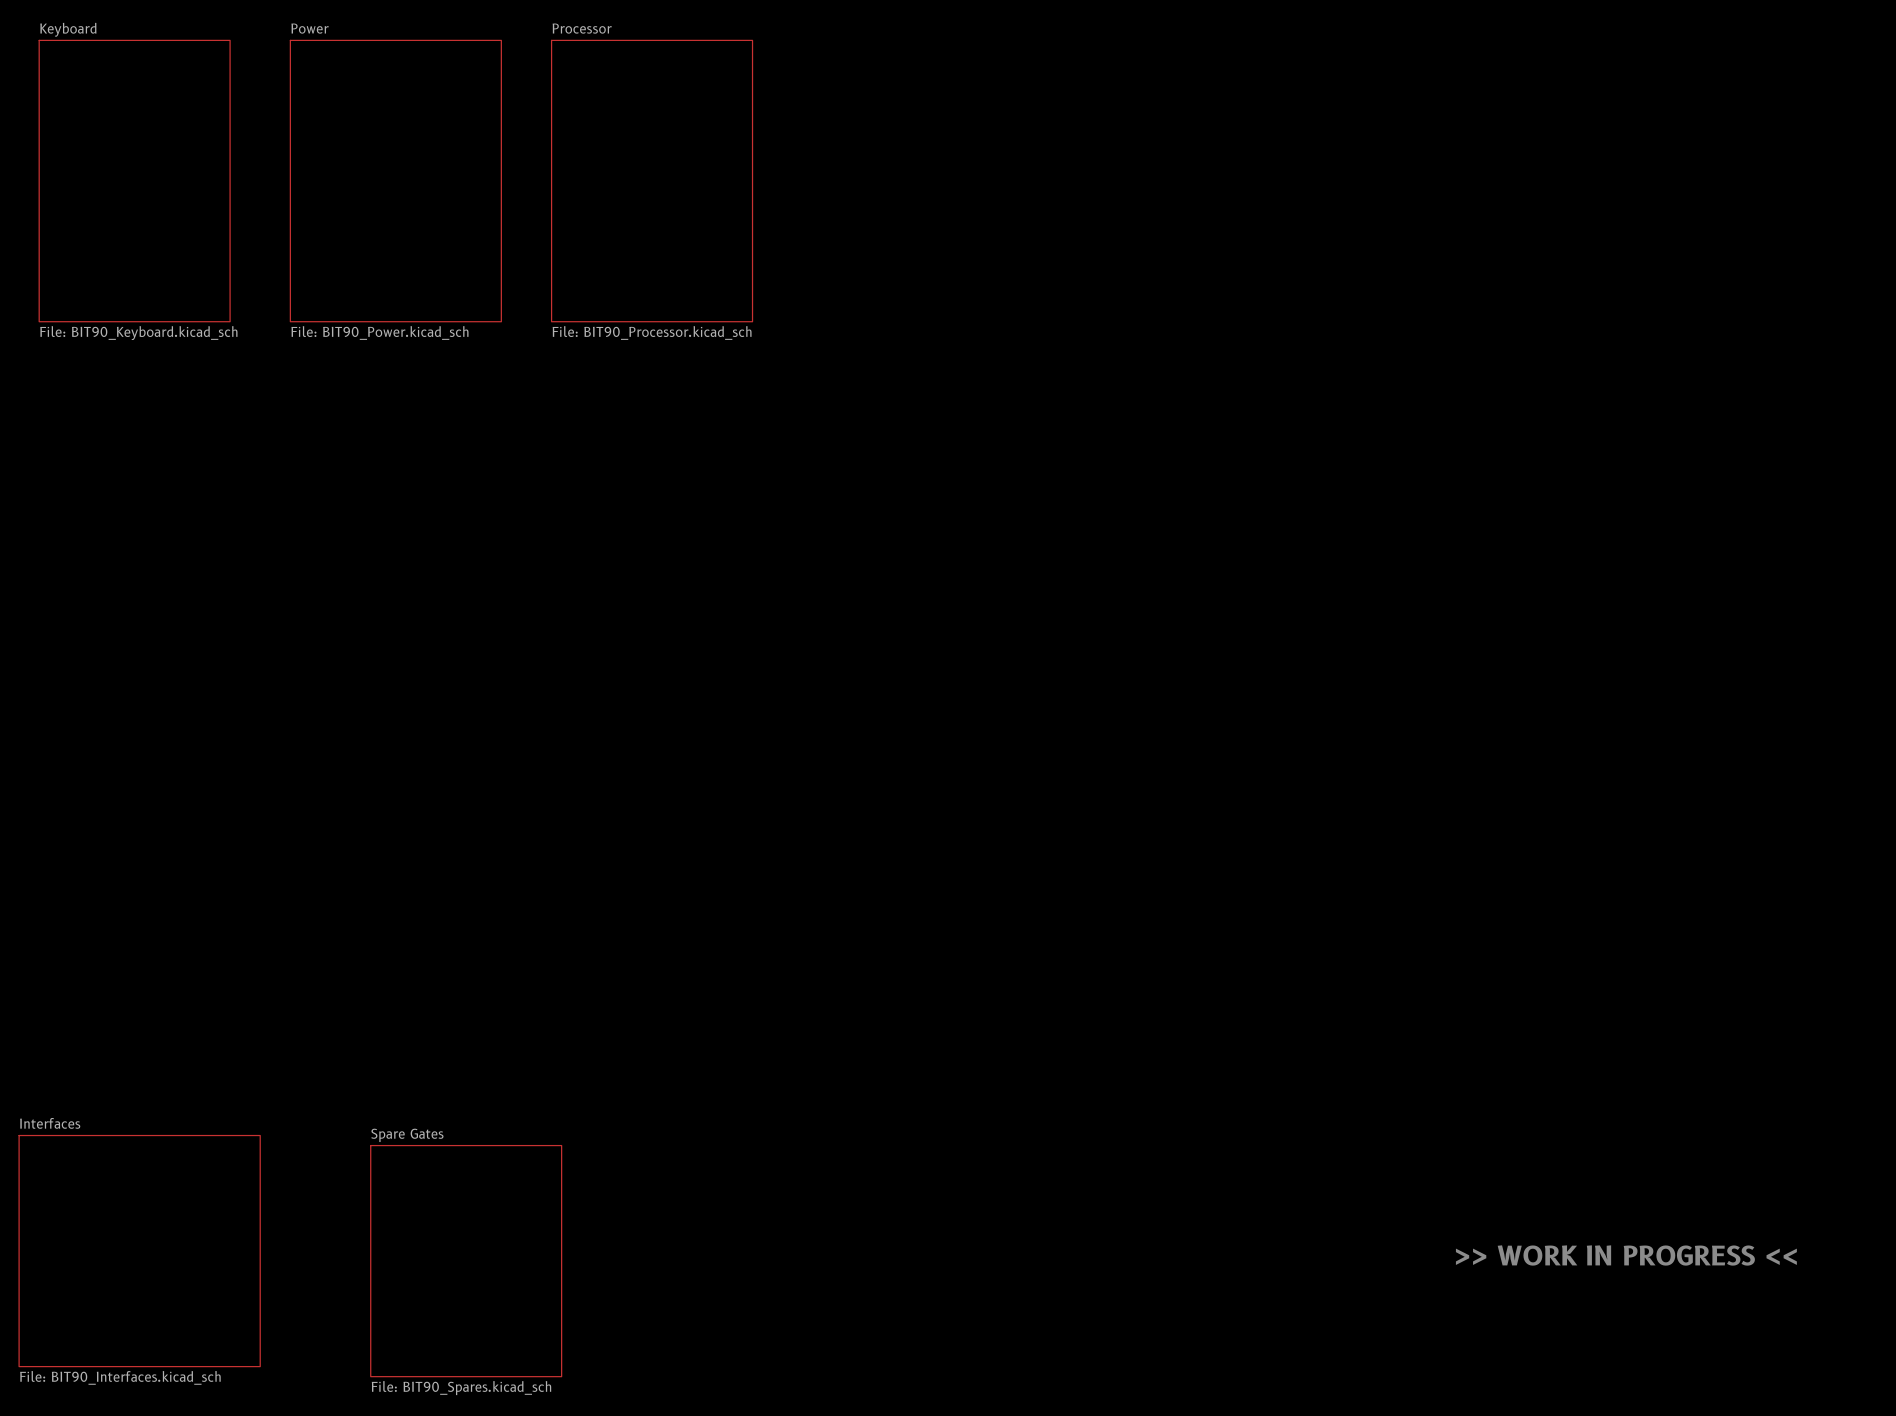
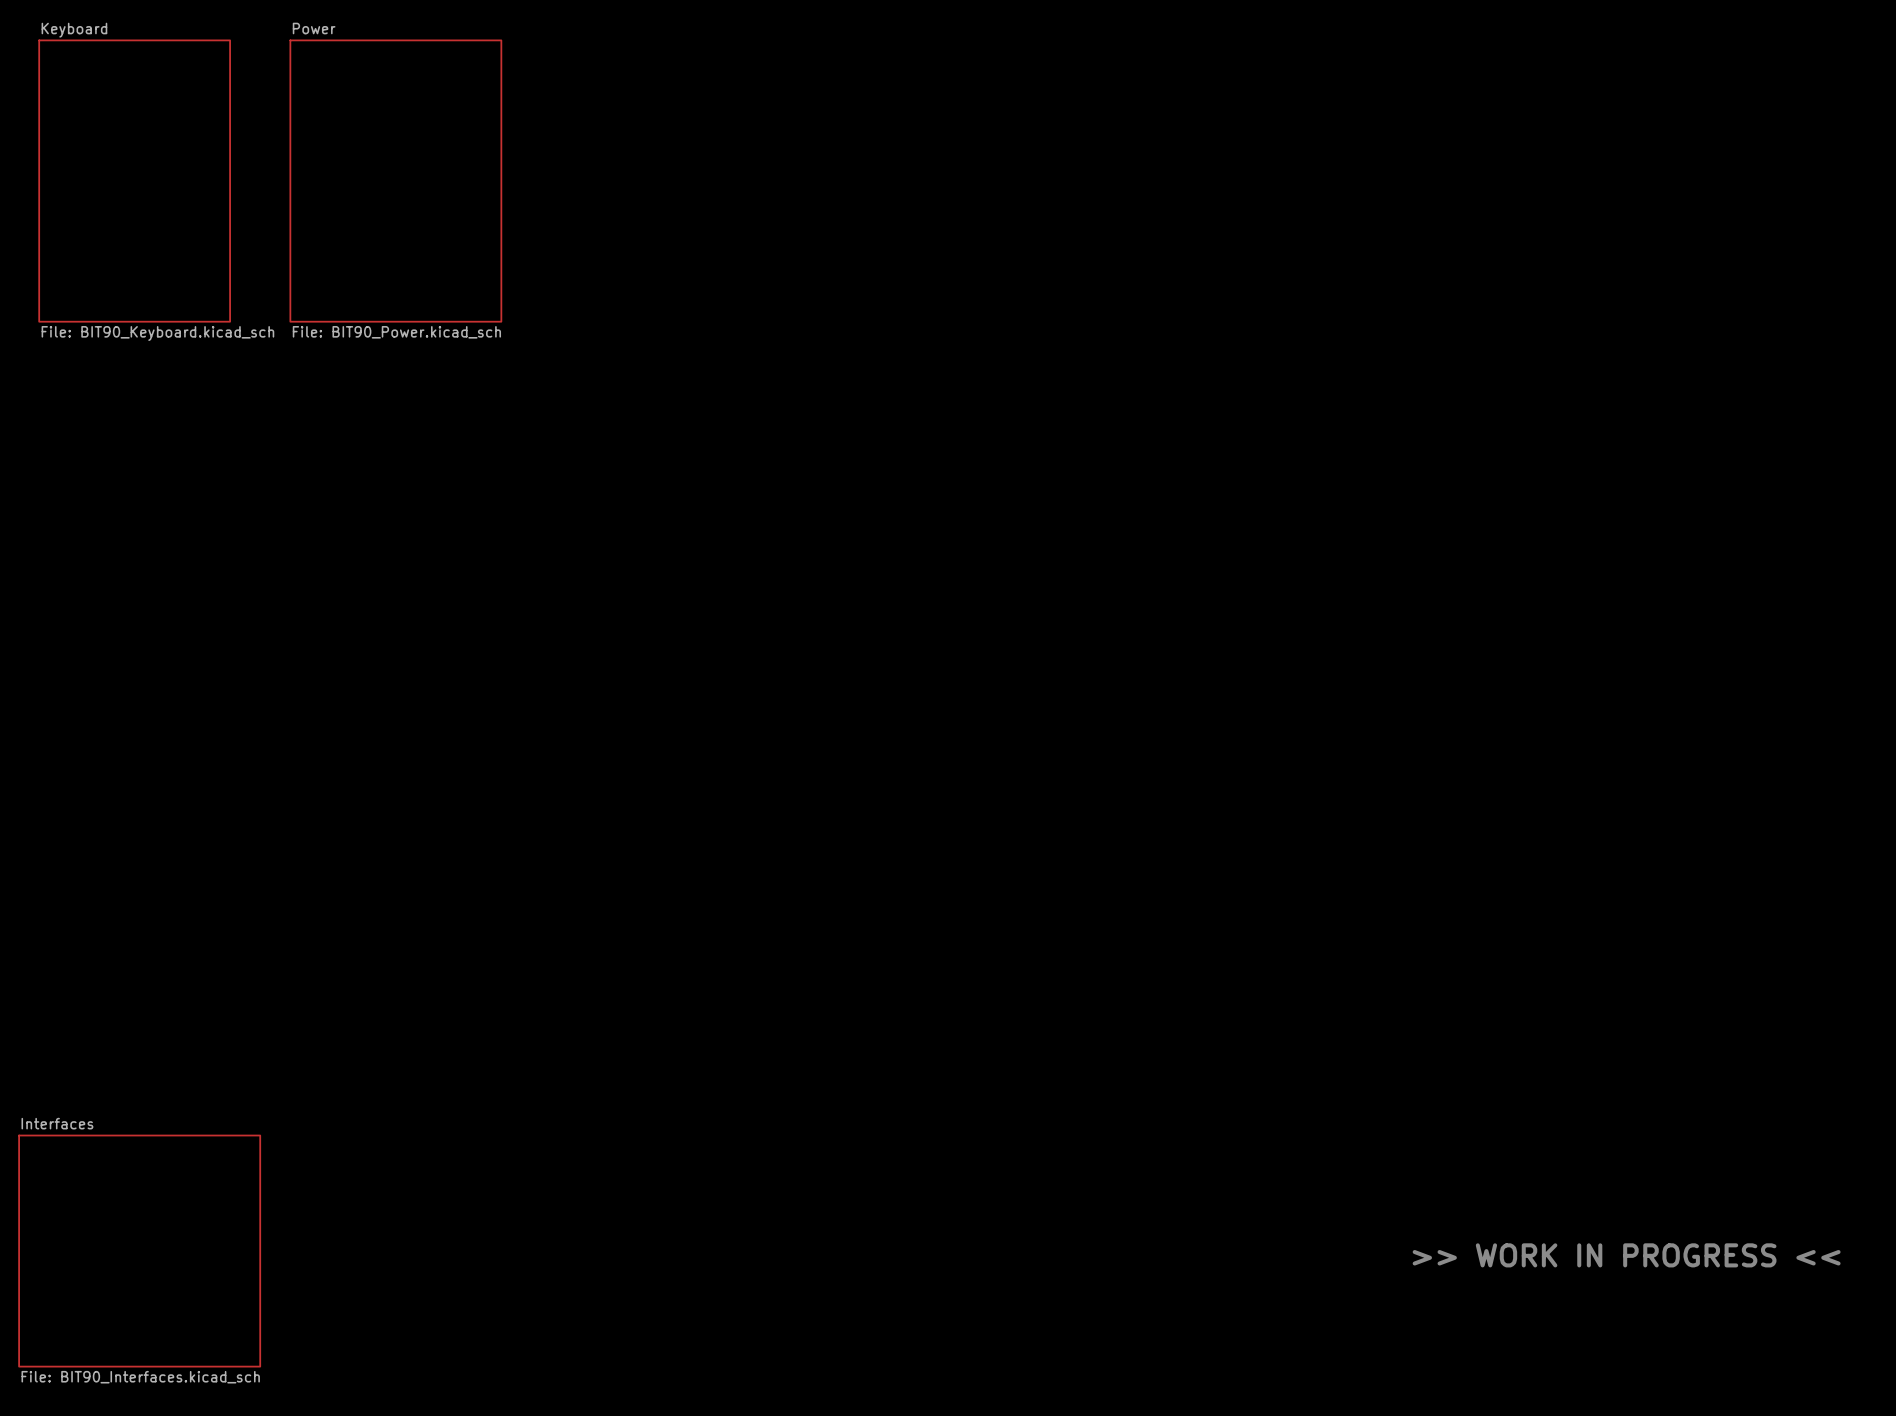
sheet Processor: File: BIT90_Processor.kicad_sch (652, 181) -> none
sheet Spare Gates: File: BIT90_Spares.kicad_sch (466, 1261) -> none

